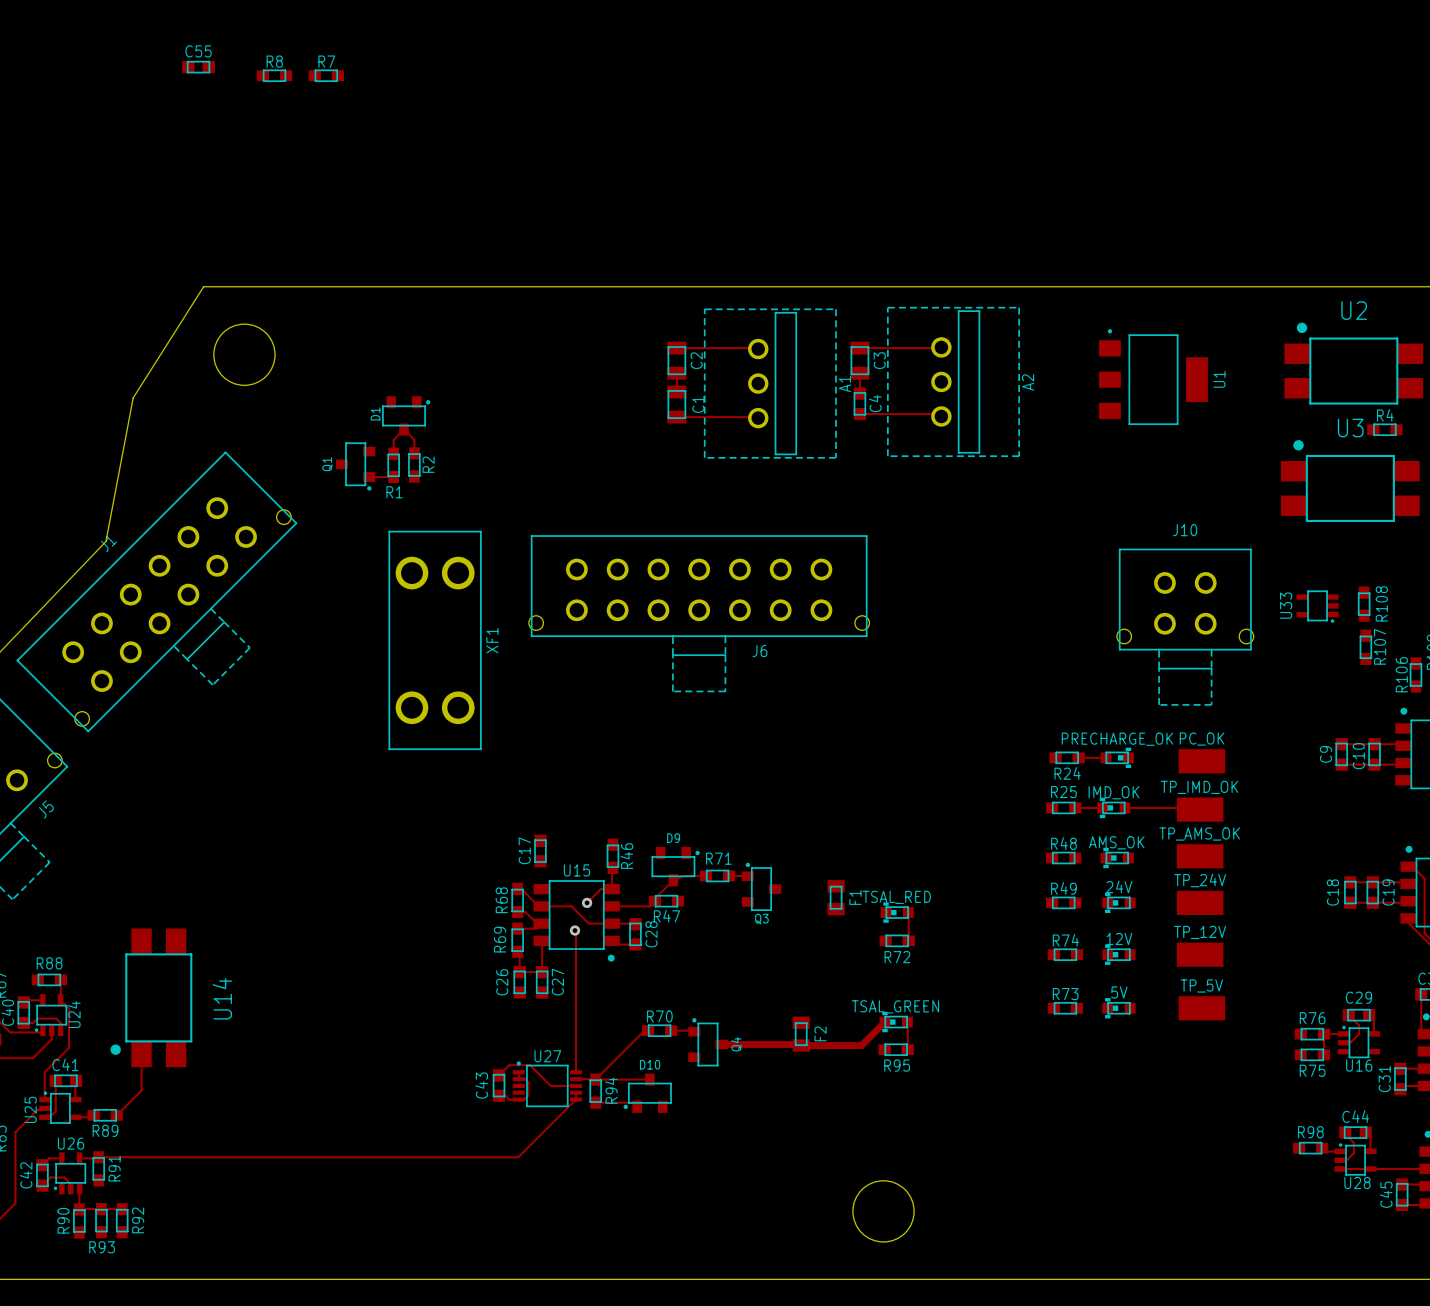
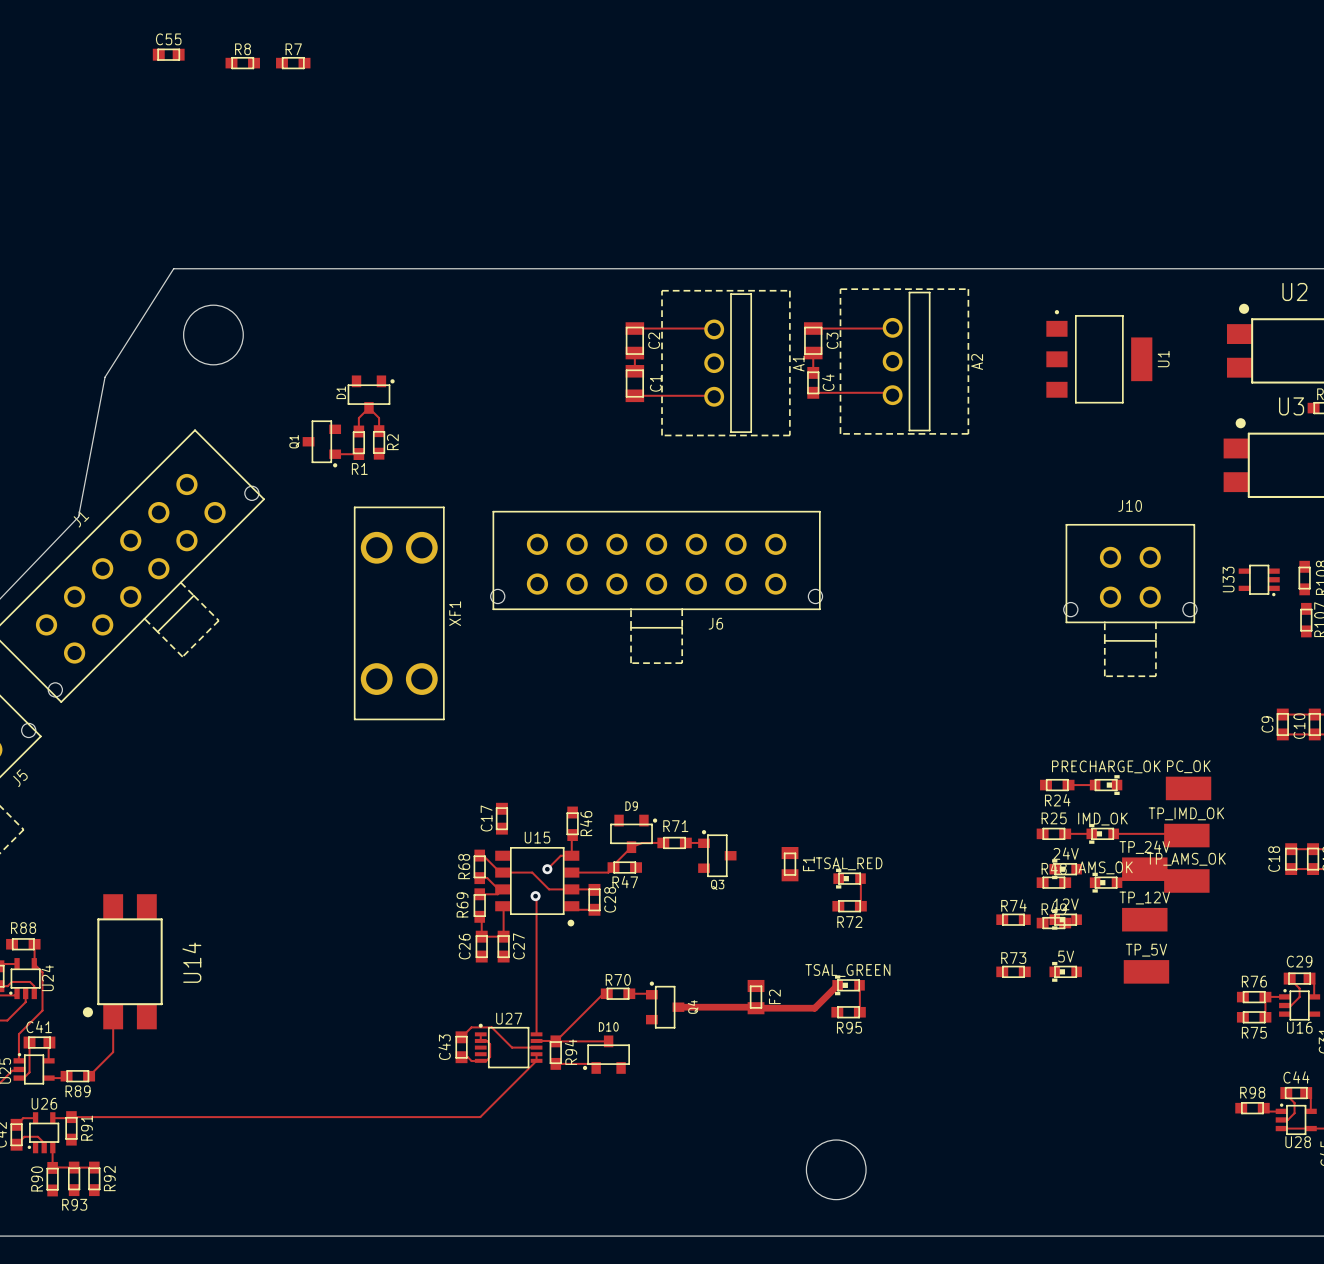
R24 position: (1067, 757) -> (1057, 785)
track: (1078, 757) (1106, 757) -> (1068, 785) (1095, 785)
PRECHARGE_OK position: (1117, 757) -> (1106, 785)
PC_OK position: (1201, 761) -> (1188, 788)
R25 position: (1063, 807) -> (1053, 833)
track: (1075, 807) (1102, 807) -> (1065, 833) (1091, 833)
IMD_OK position: (1113, 807) -> (1102, 833)
track: (1124, 807) (1198, 807) (1200, 809) -> (1113, 833) (1185, 833) (1186, 835)
TP_IMD_OK position: (1200, 809) -> (1186, 835)
TP_AMS_OK position: (1200, 856) -> (1186, 880)
R48 position: (1063, 858) -> (1053, 882)
AMS_OK position: (1117, 858) -> (1106, 882)
R49 position: (1063, 902) -> (1053, 923)

